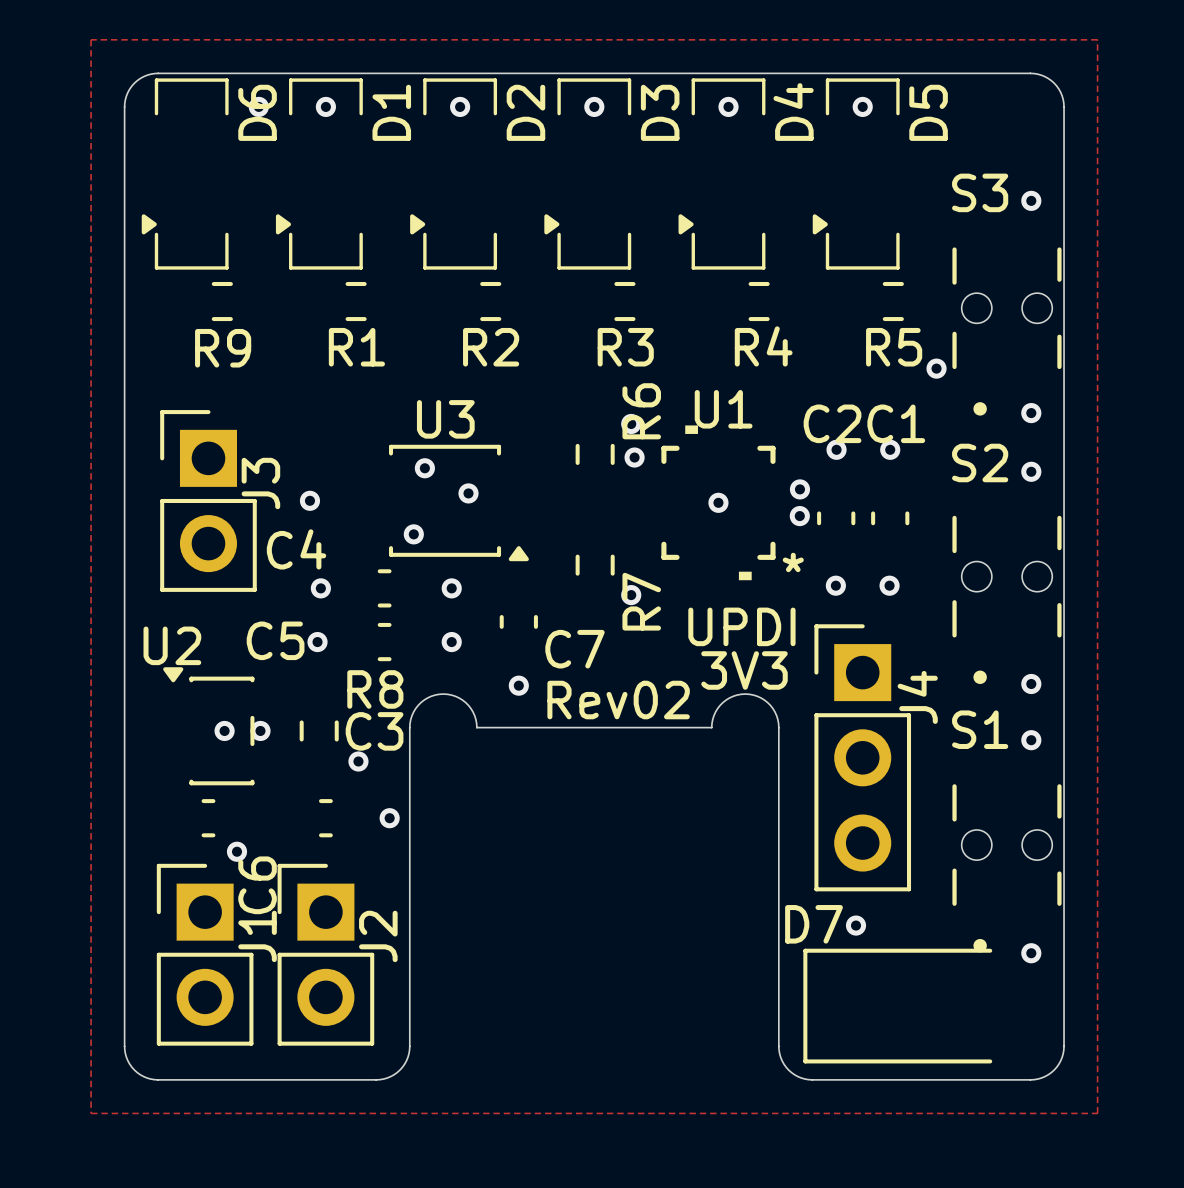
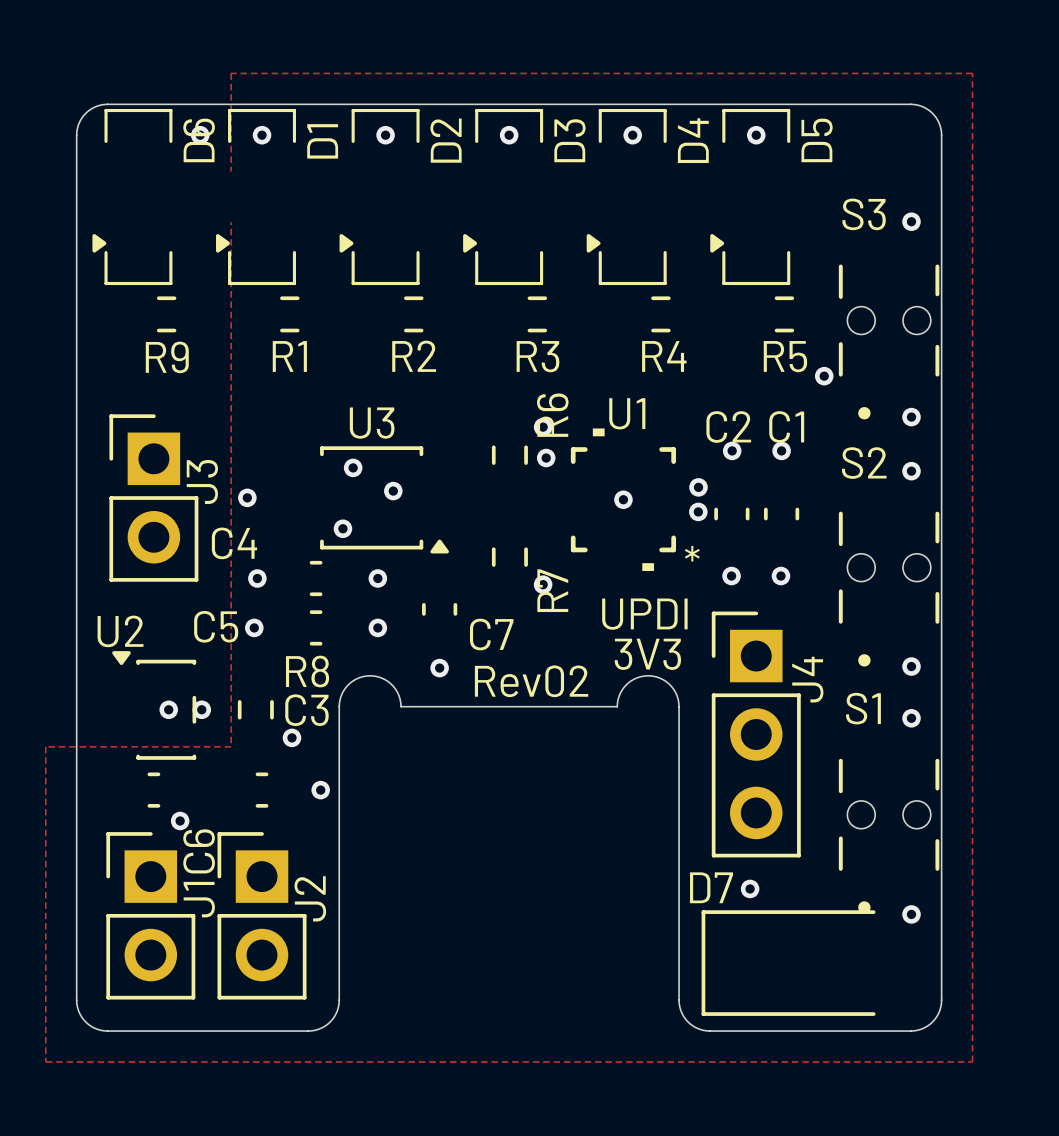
zone outline: (292, 39) (91, 39) (91, 771) -> (231, 73) (231, 746) (45, 746)

